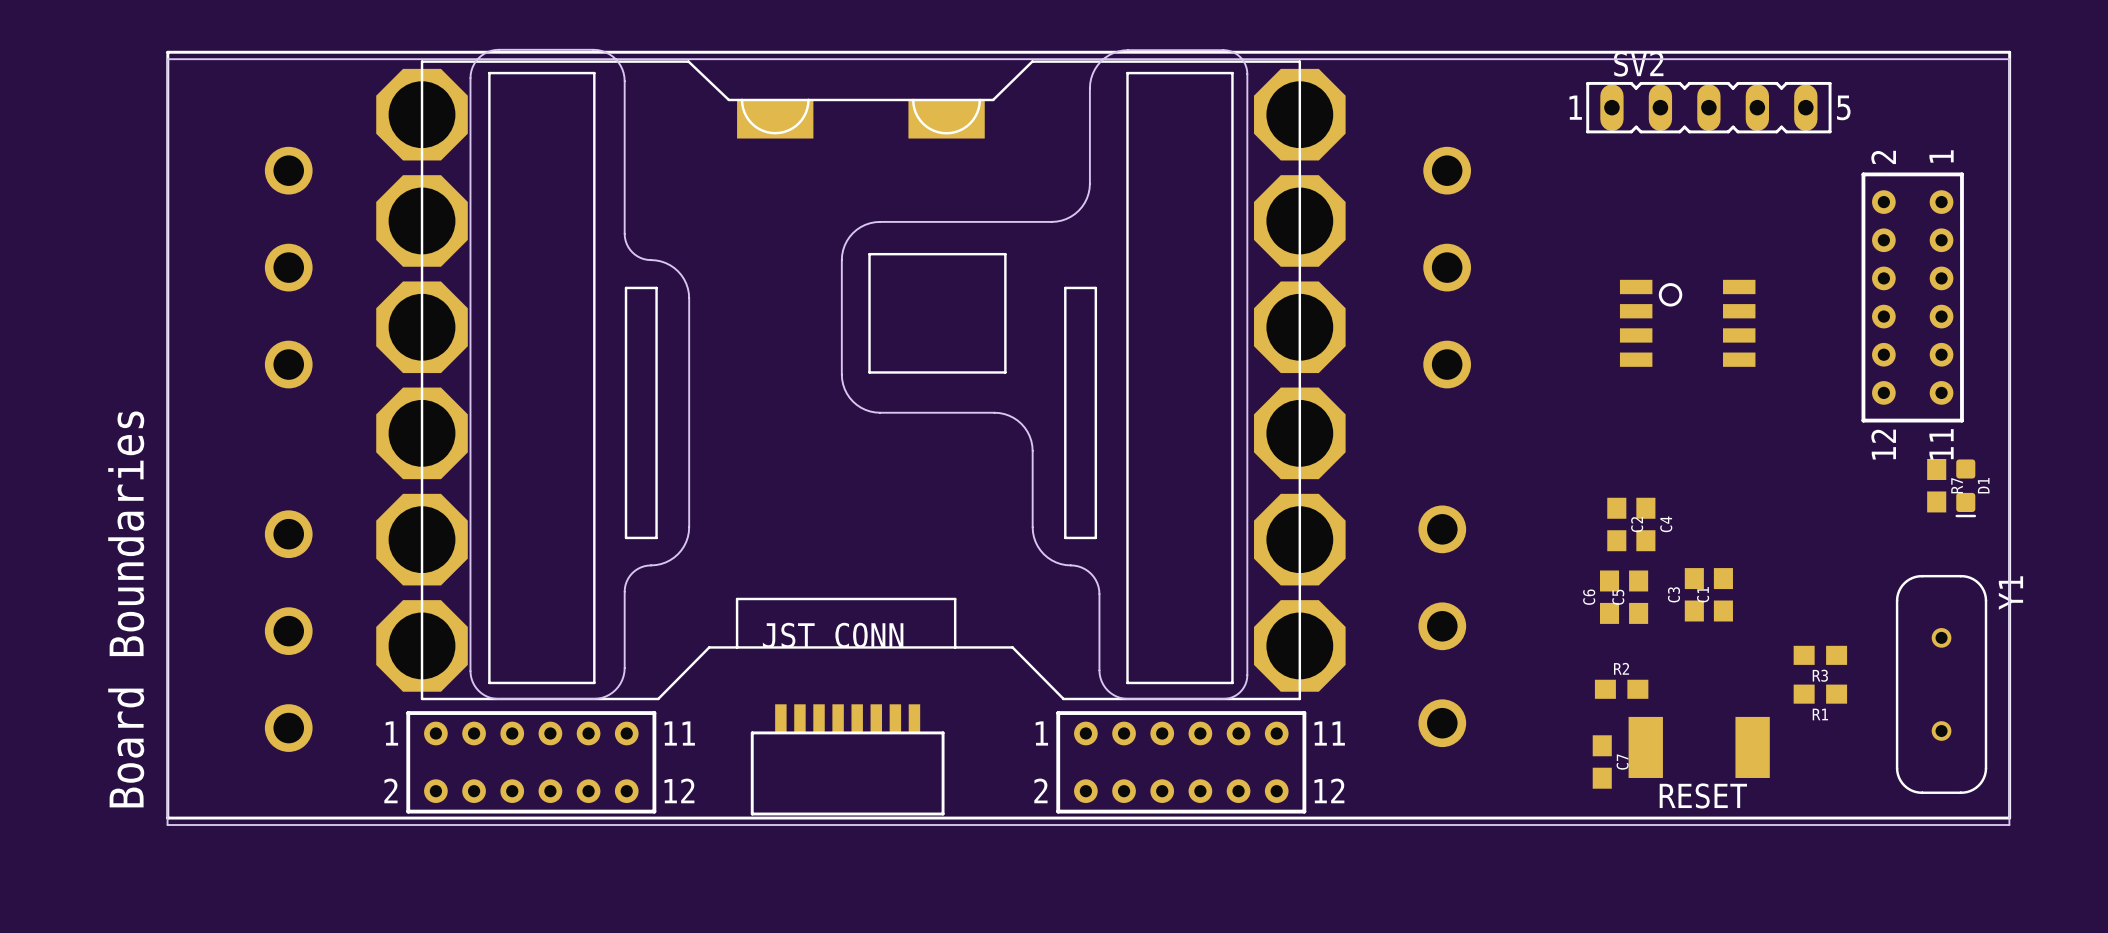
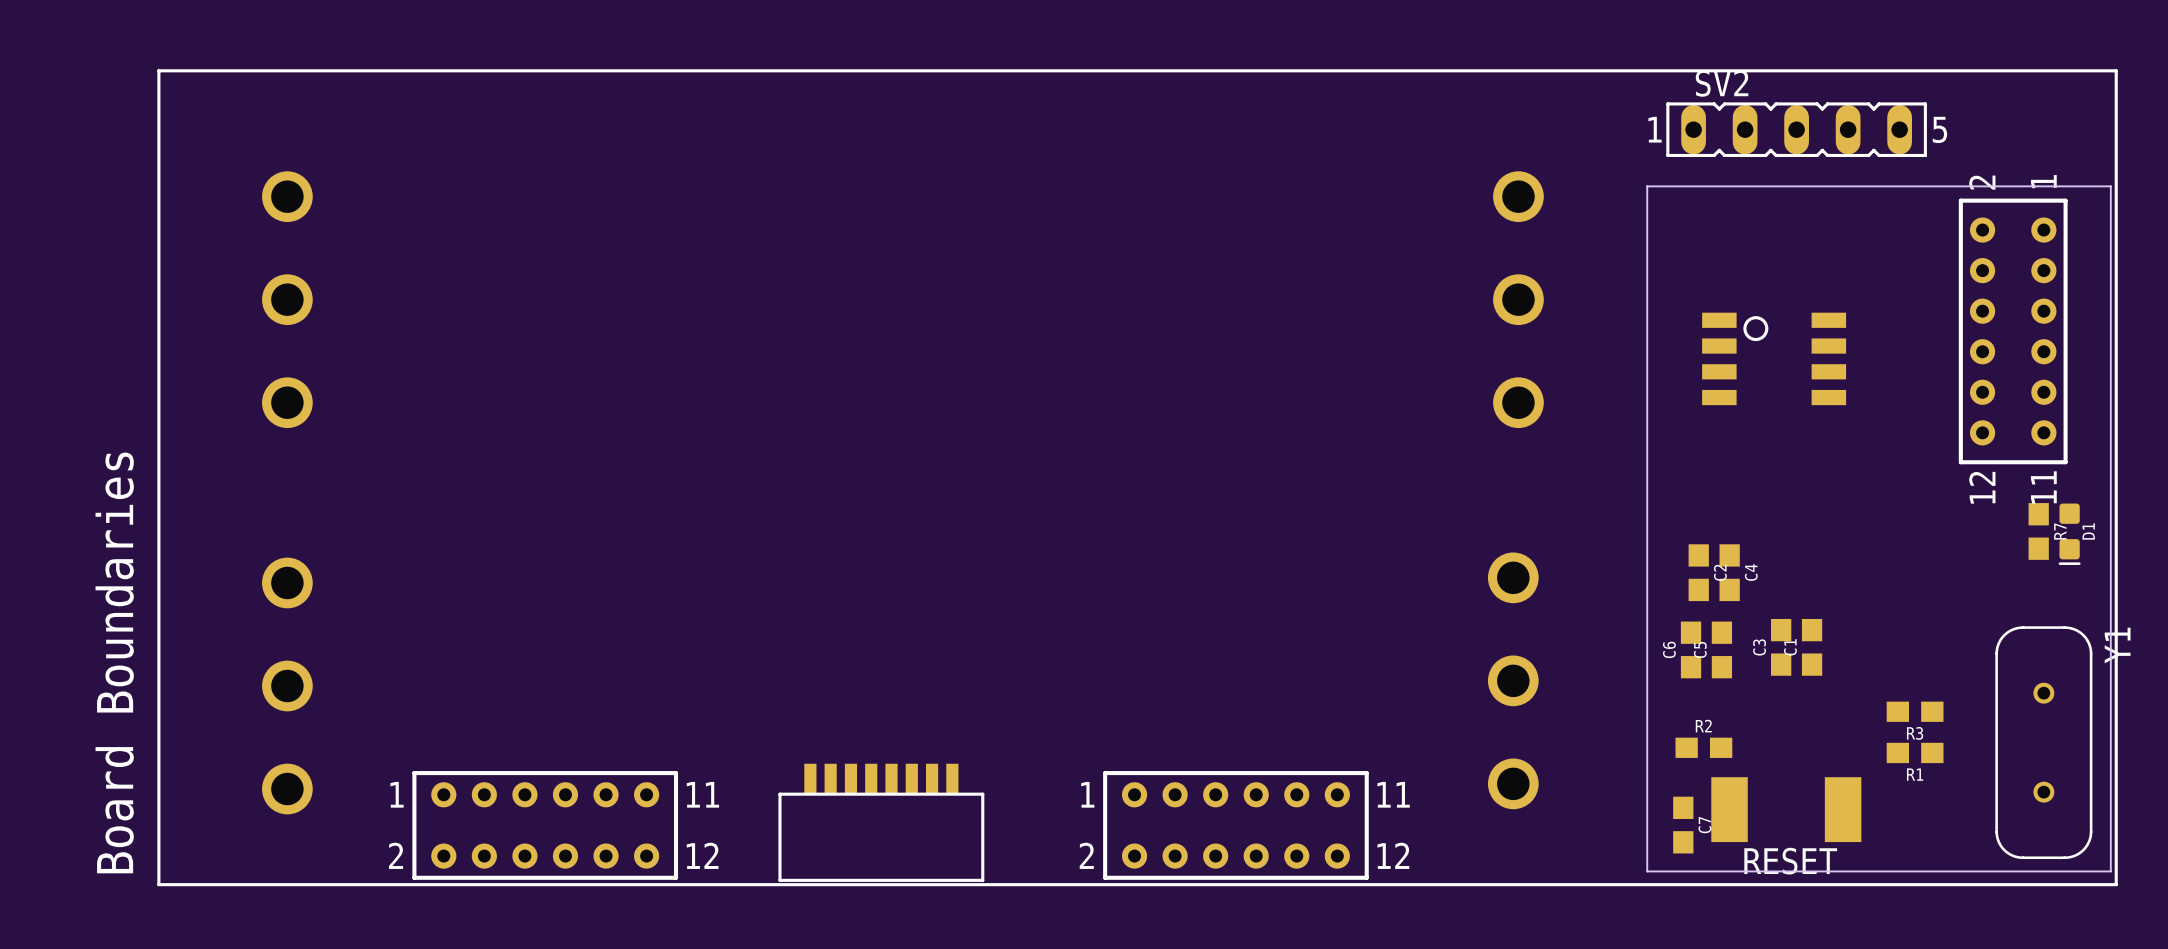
board edge: (167, 59) (2009, 59) (2009, 825) (167, 825) (167, 59) -> none
board edge: none -> (1647, 186) (2110, 186) (2110, 871) (1647, 871) (1647, 186)
part: (860, 374) -> none

